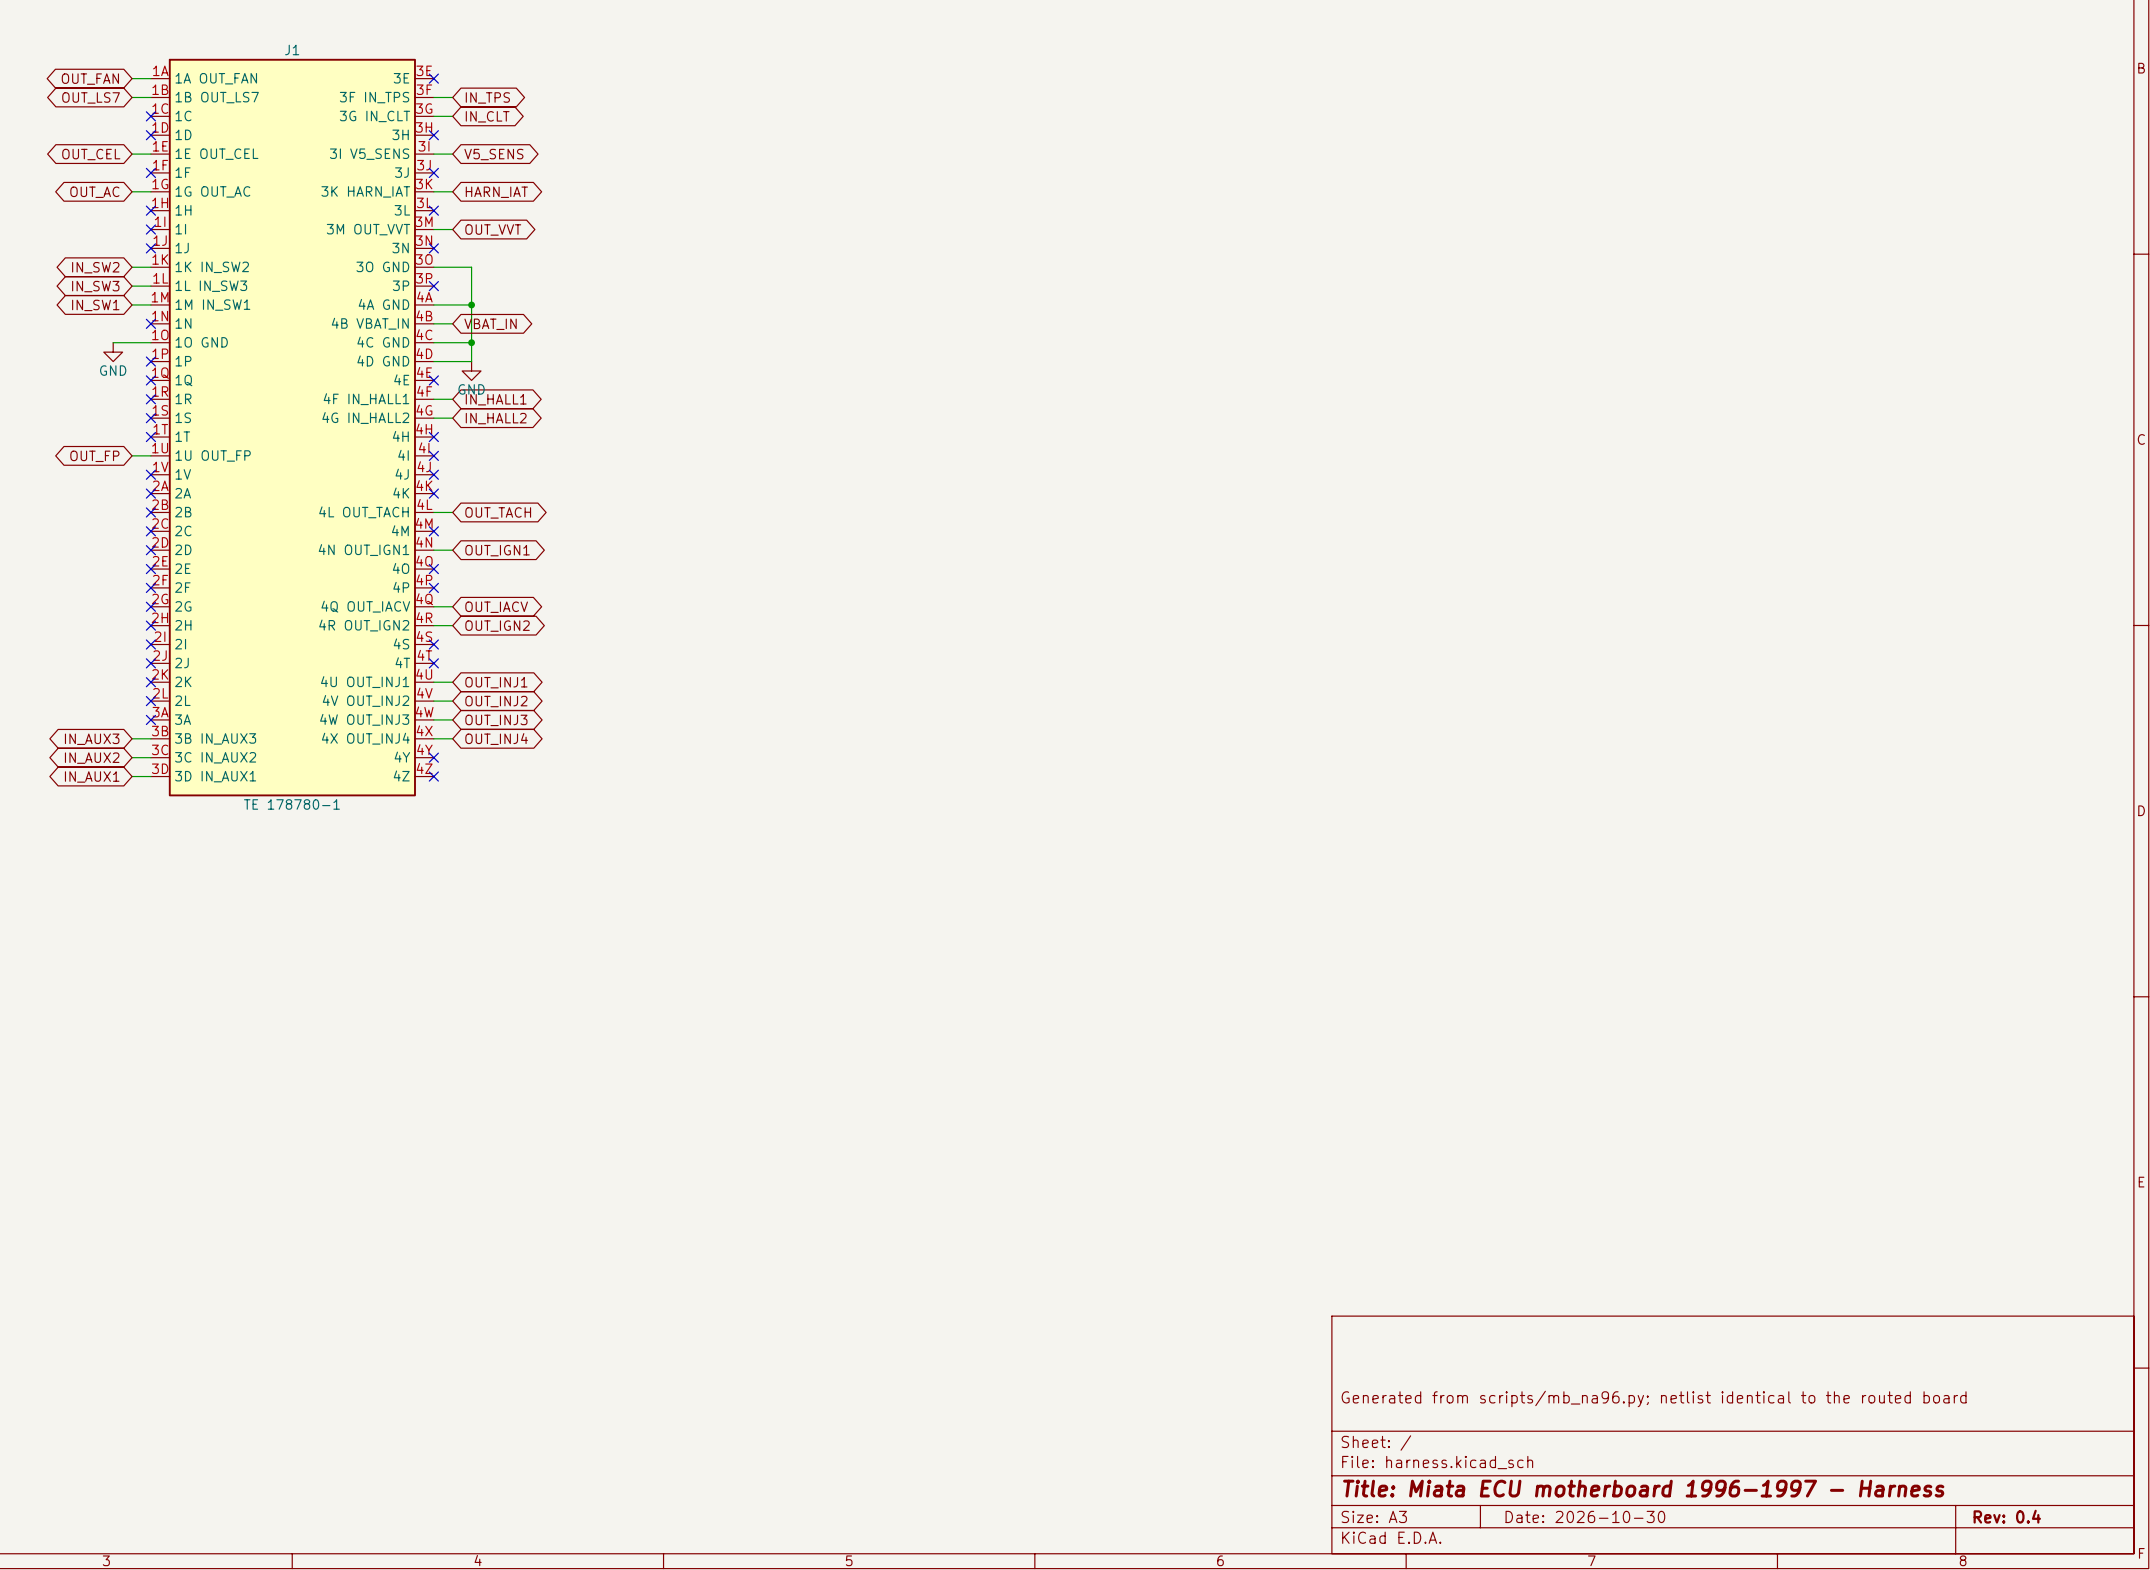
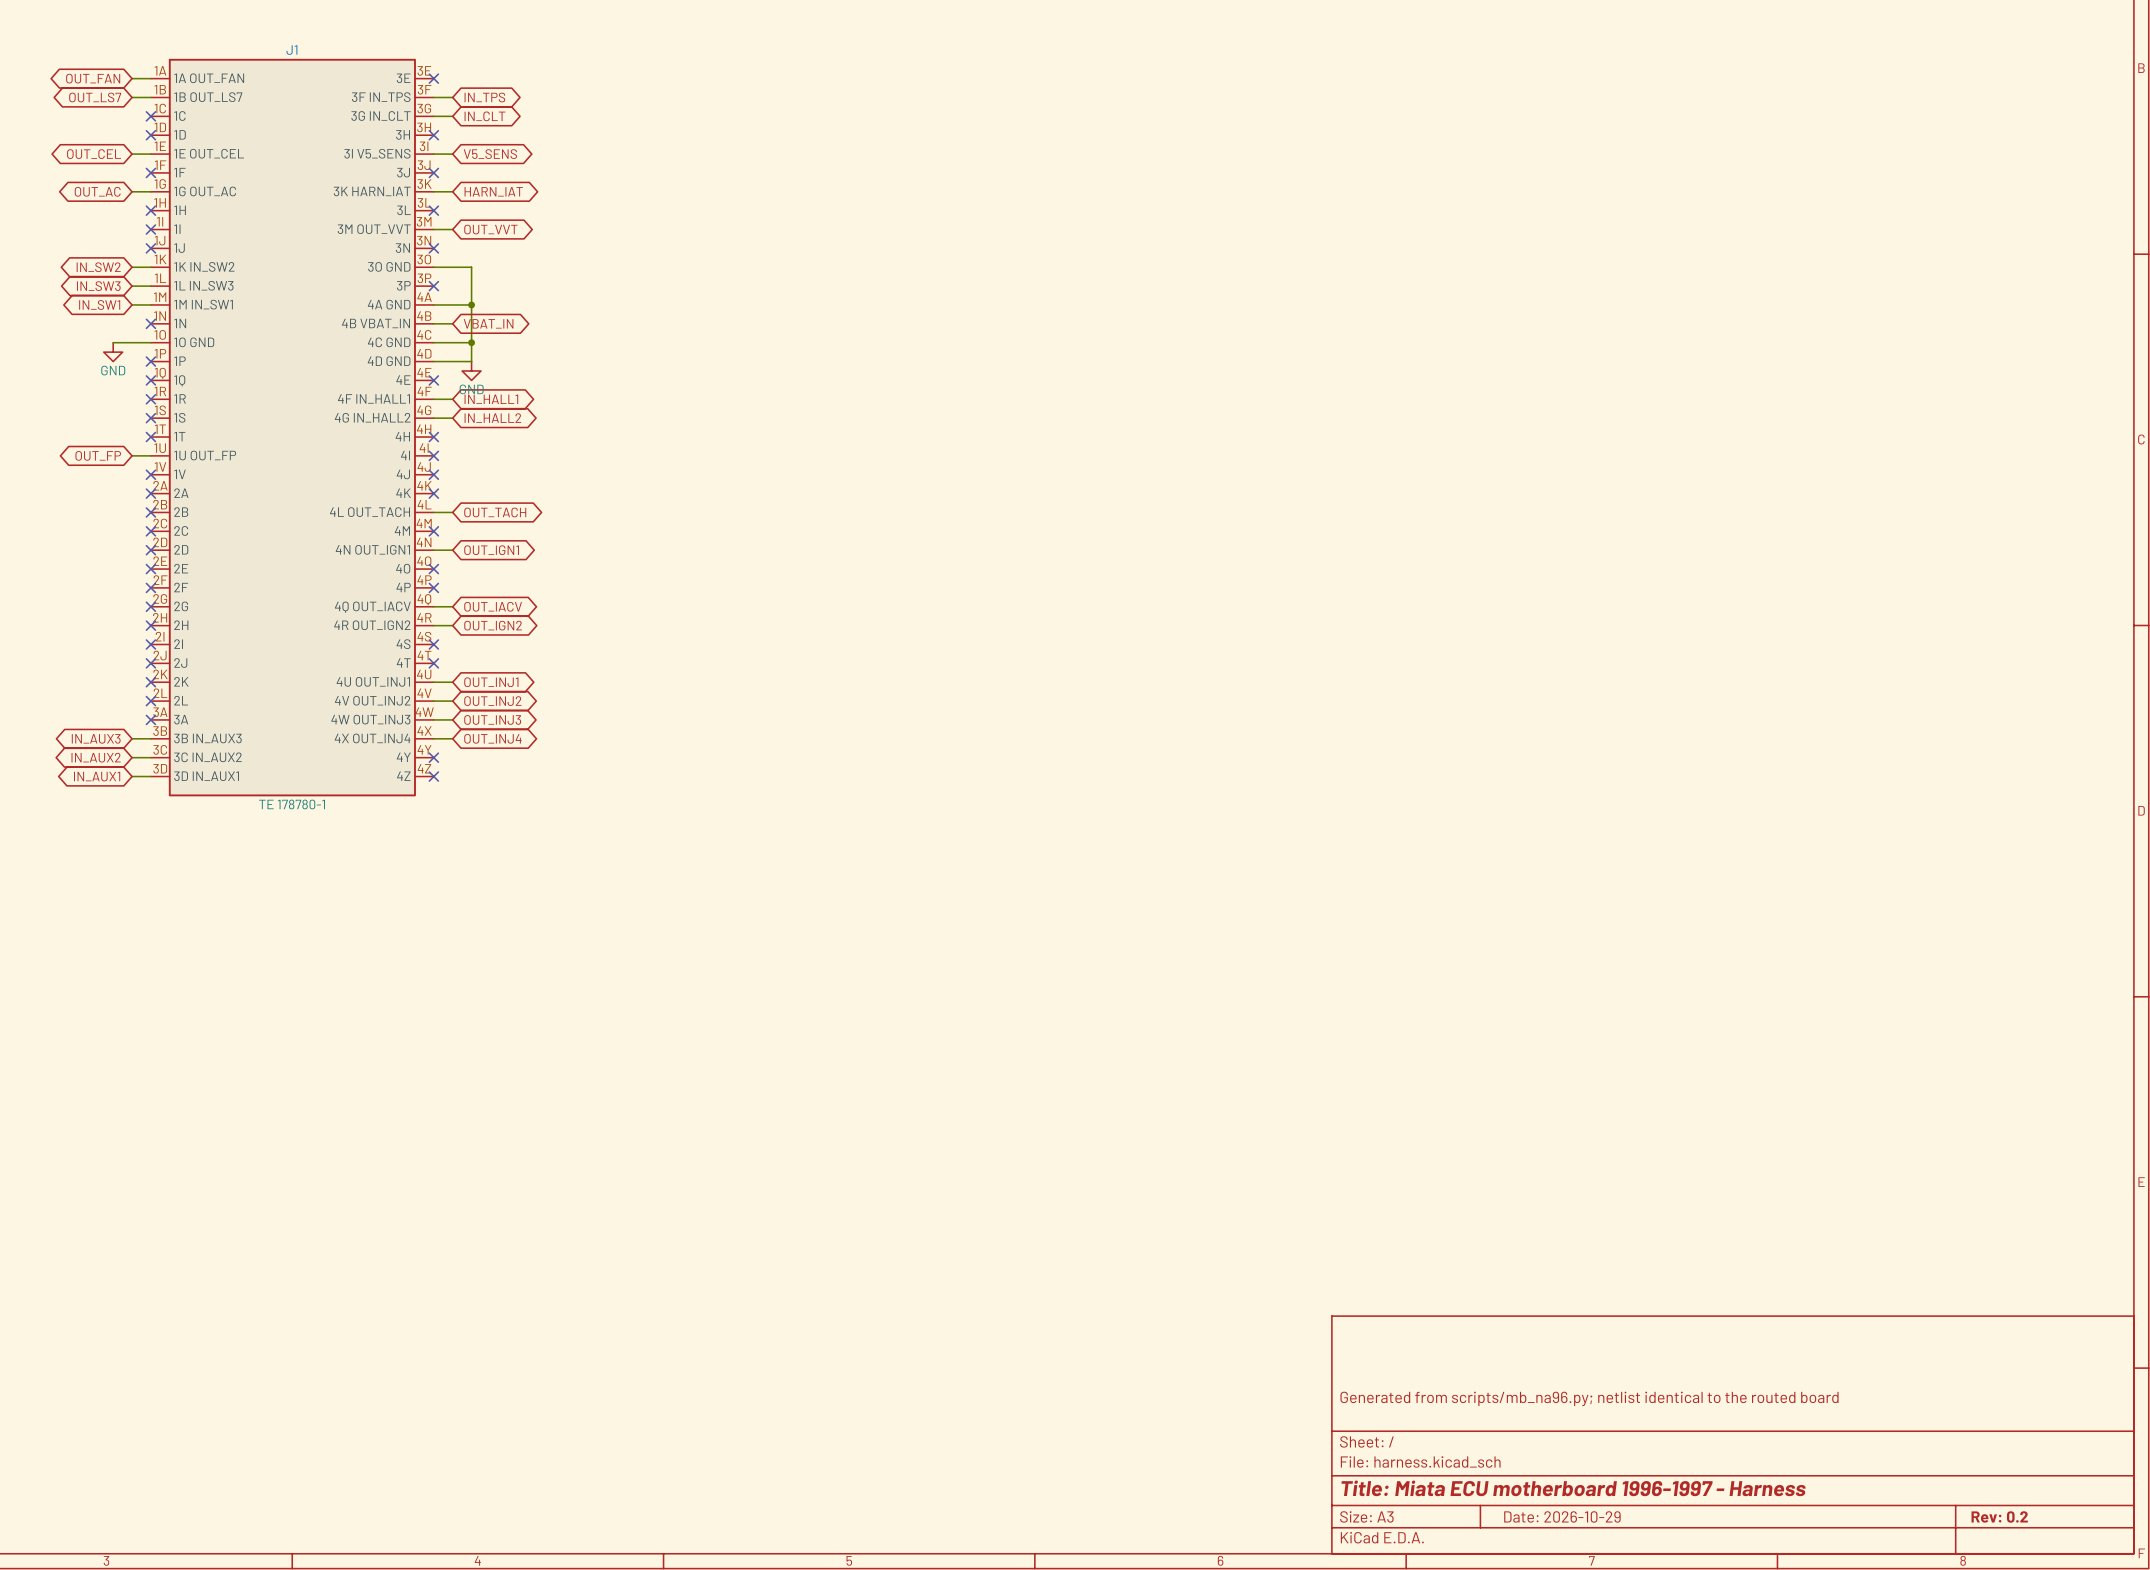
title block: Date: 2026-10-30 (1585, 1516) -> Date: 2026-10-29 (1562, 1516)
title block: Rev: 0.4 (2007, 1516) -> Rev: 0.2 (1999, 1516)

